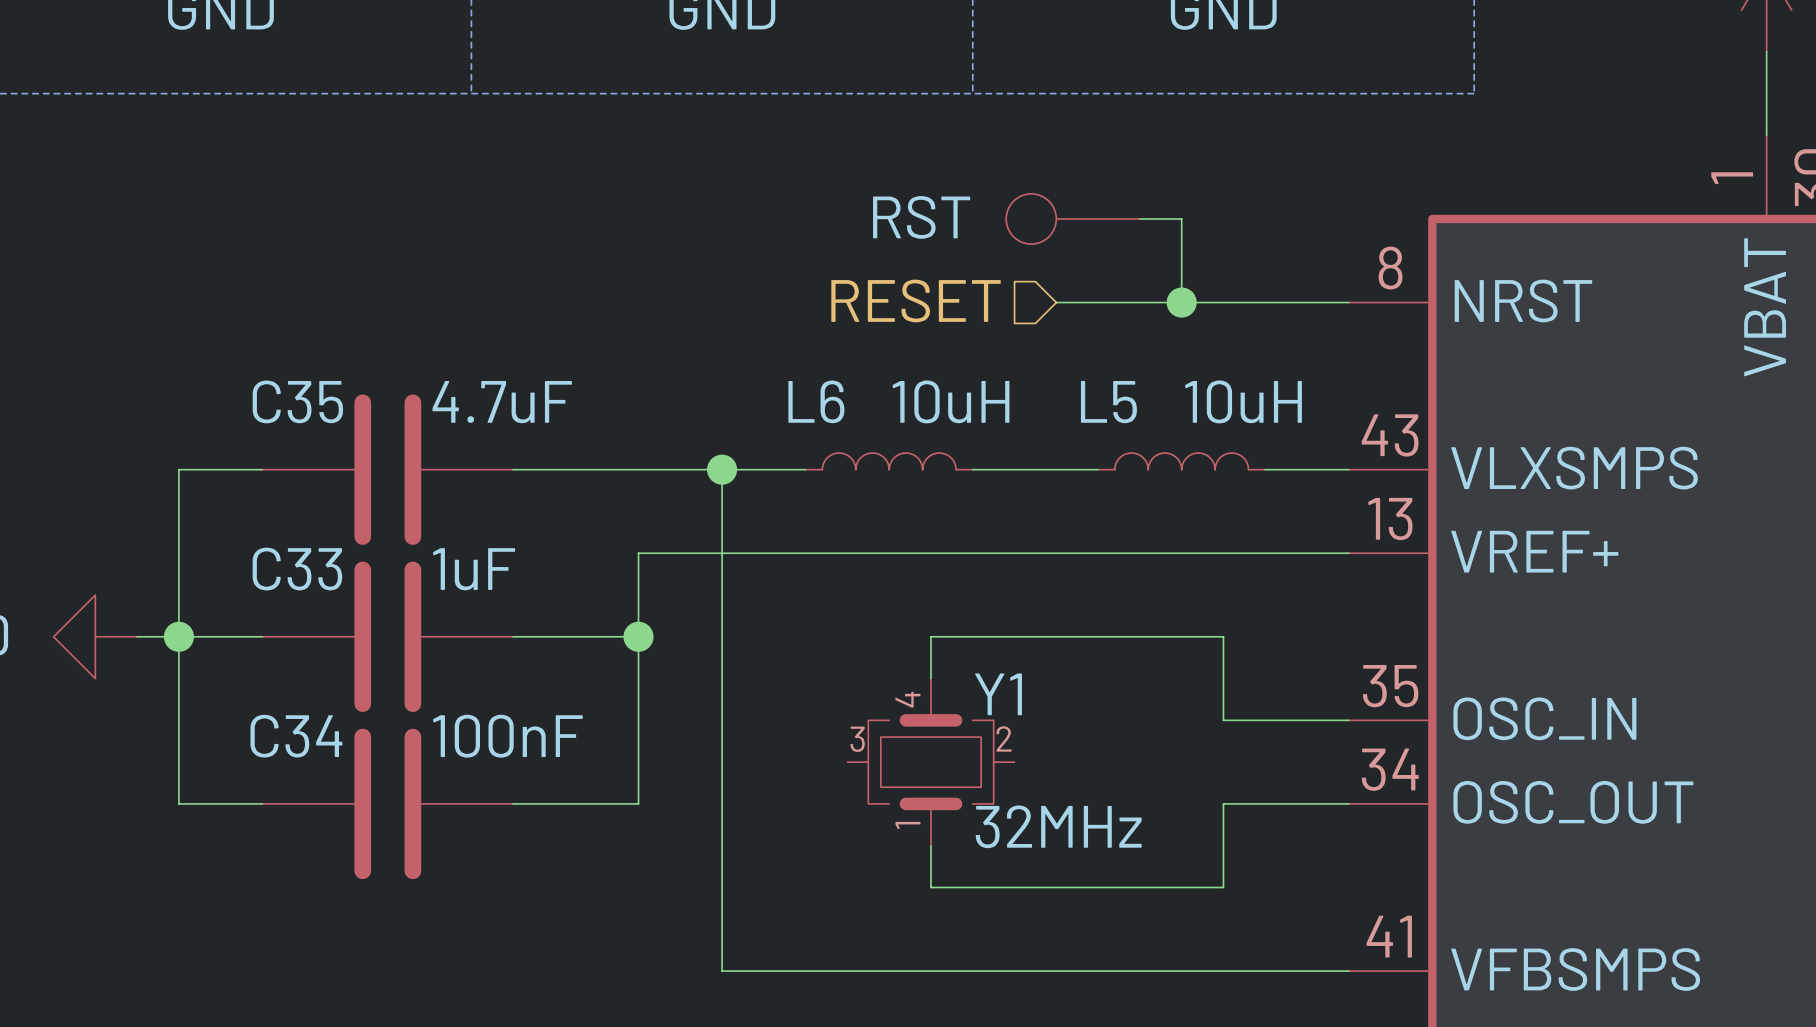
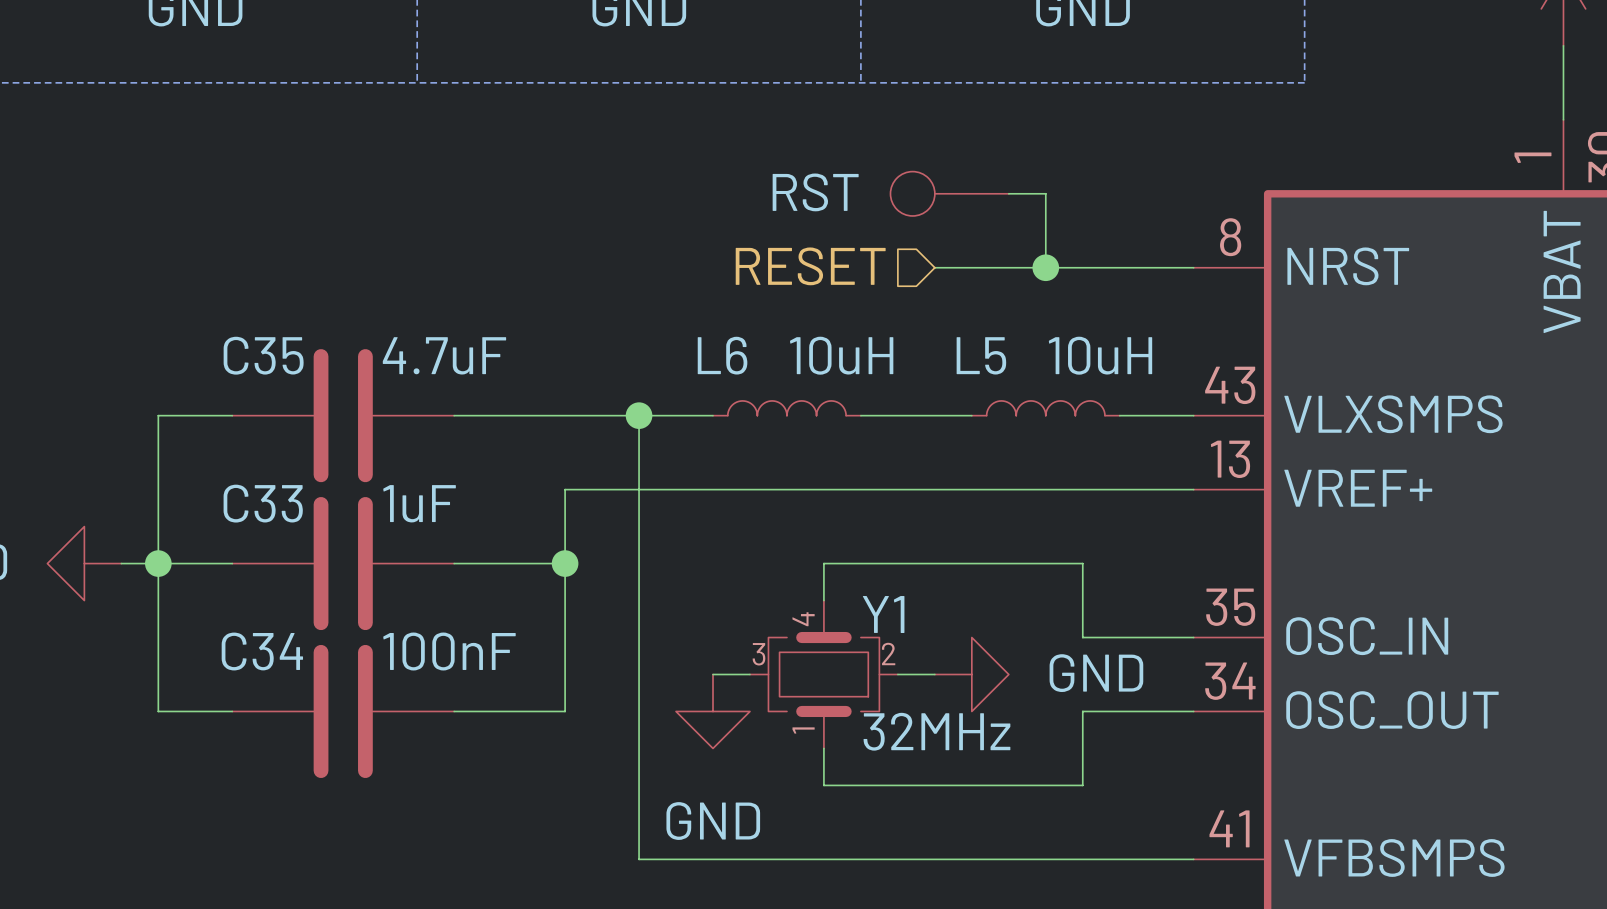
wire: none -> (713, 674) (749, 674)
wire: none -> (897, 674) (934, 674)
power symbol: none -> GND (971, 674)
power symbol: none -> GND (713, 711)

